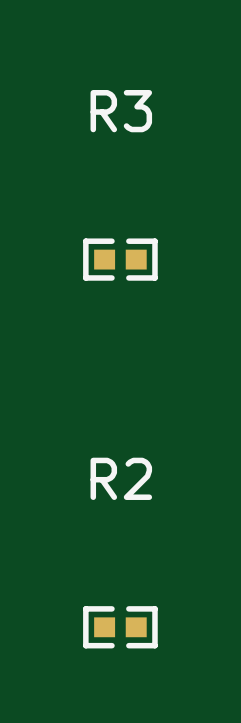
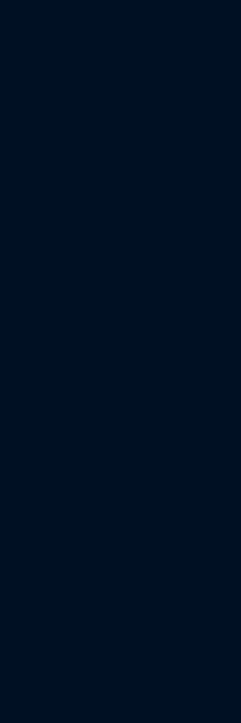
R3: (120, 259) -> none
R2: (120, 627) -> none

